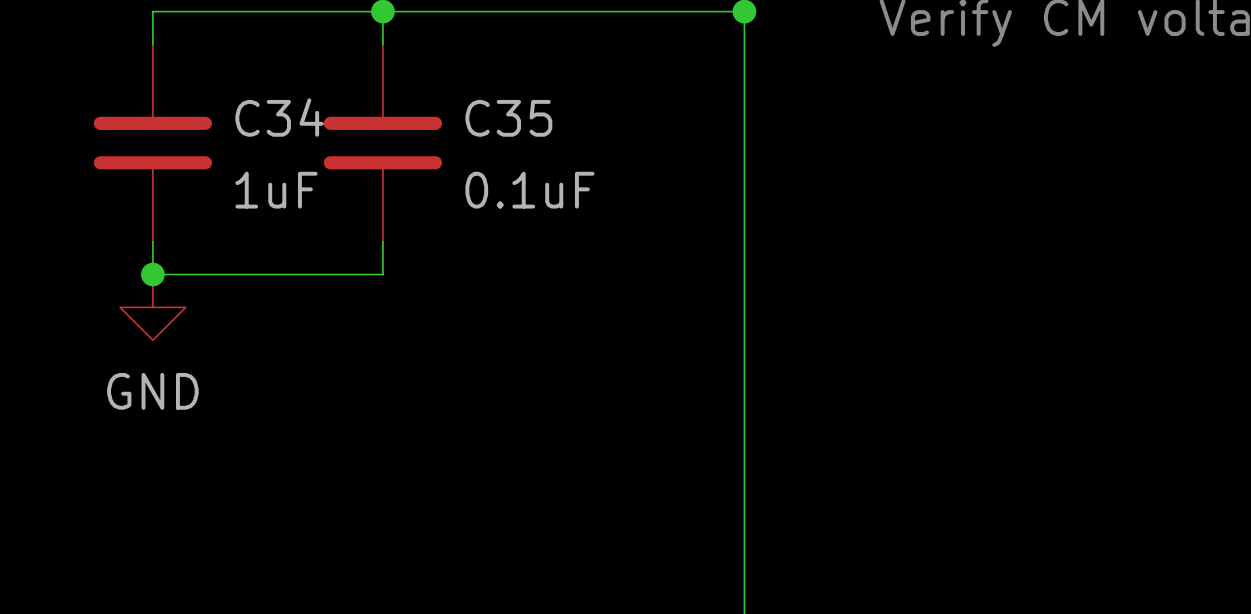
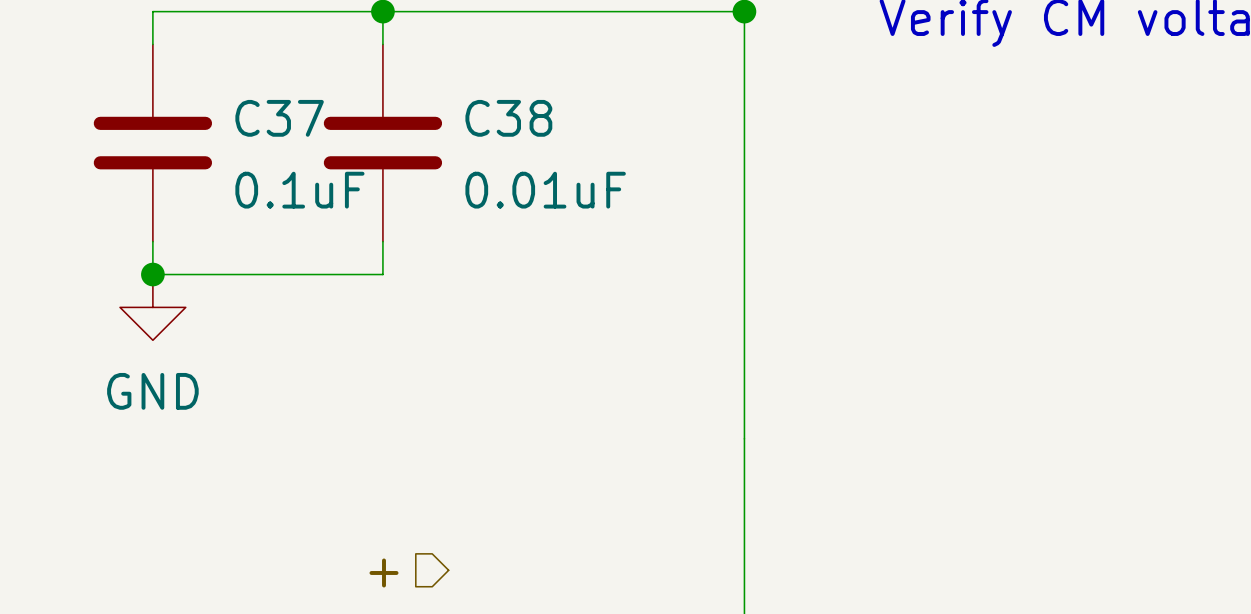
C34 name: C34 (279, 117) -> C37 (279, 118)
C35 name: C35 (508, 118) -> C38 (508, 118)
C34 value: 1uF (276, 190) -> 0.1uF (299, 190)
C35 value: 0.1uF (529, 190) -> 0.01uF (545, 190)
hierarchical label: none -> + (384, 572)

